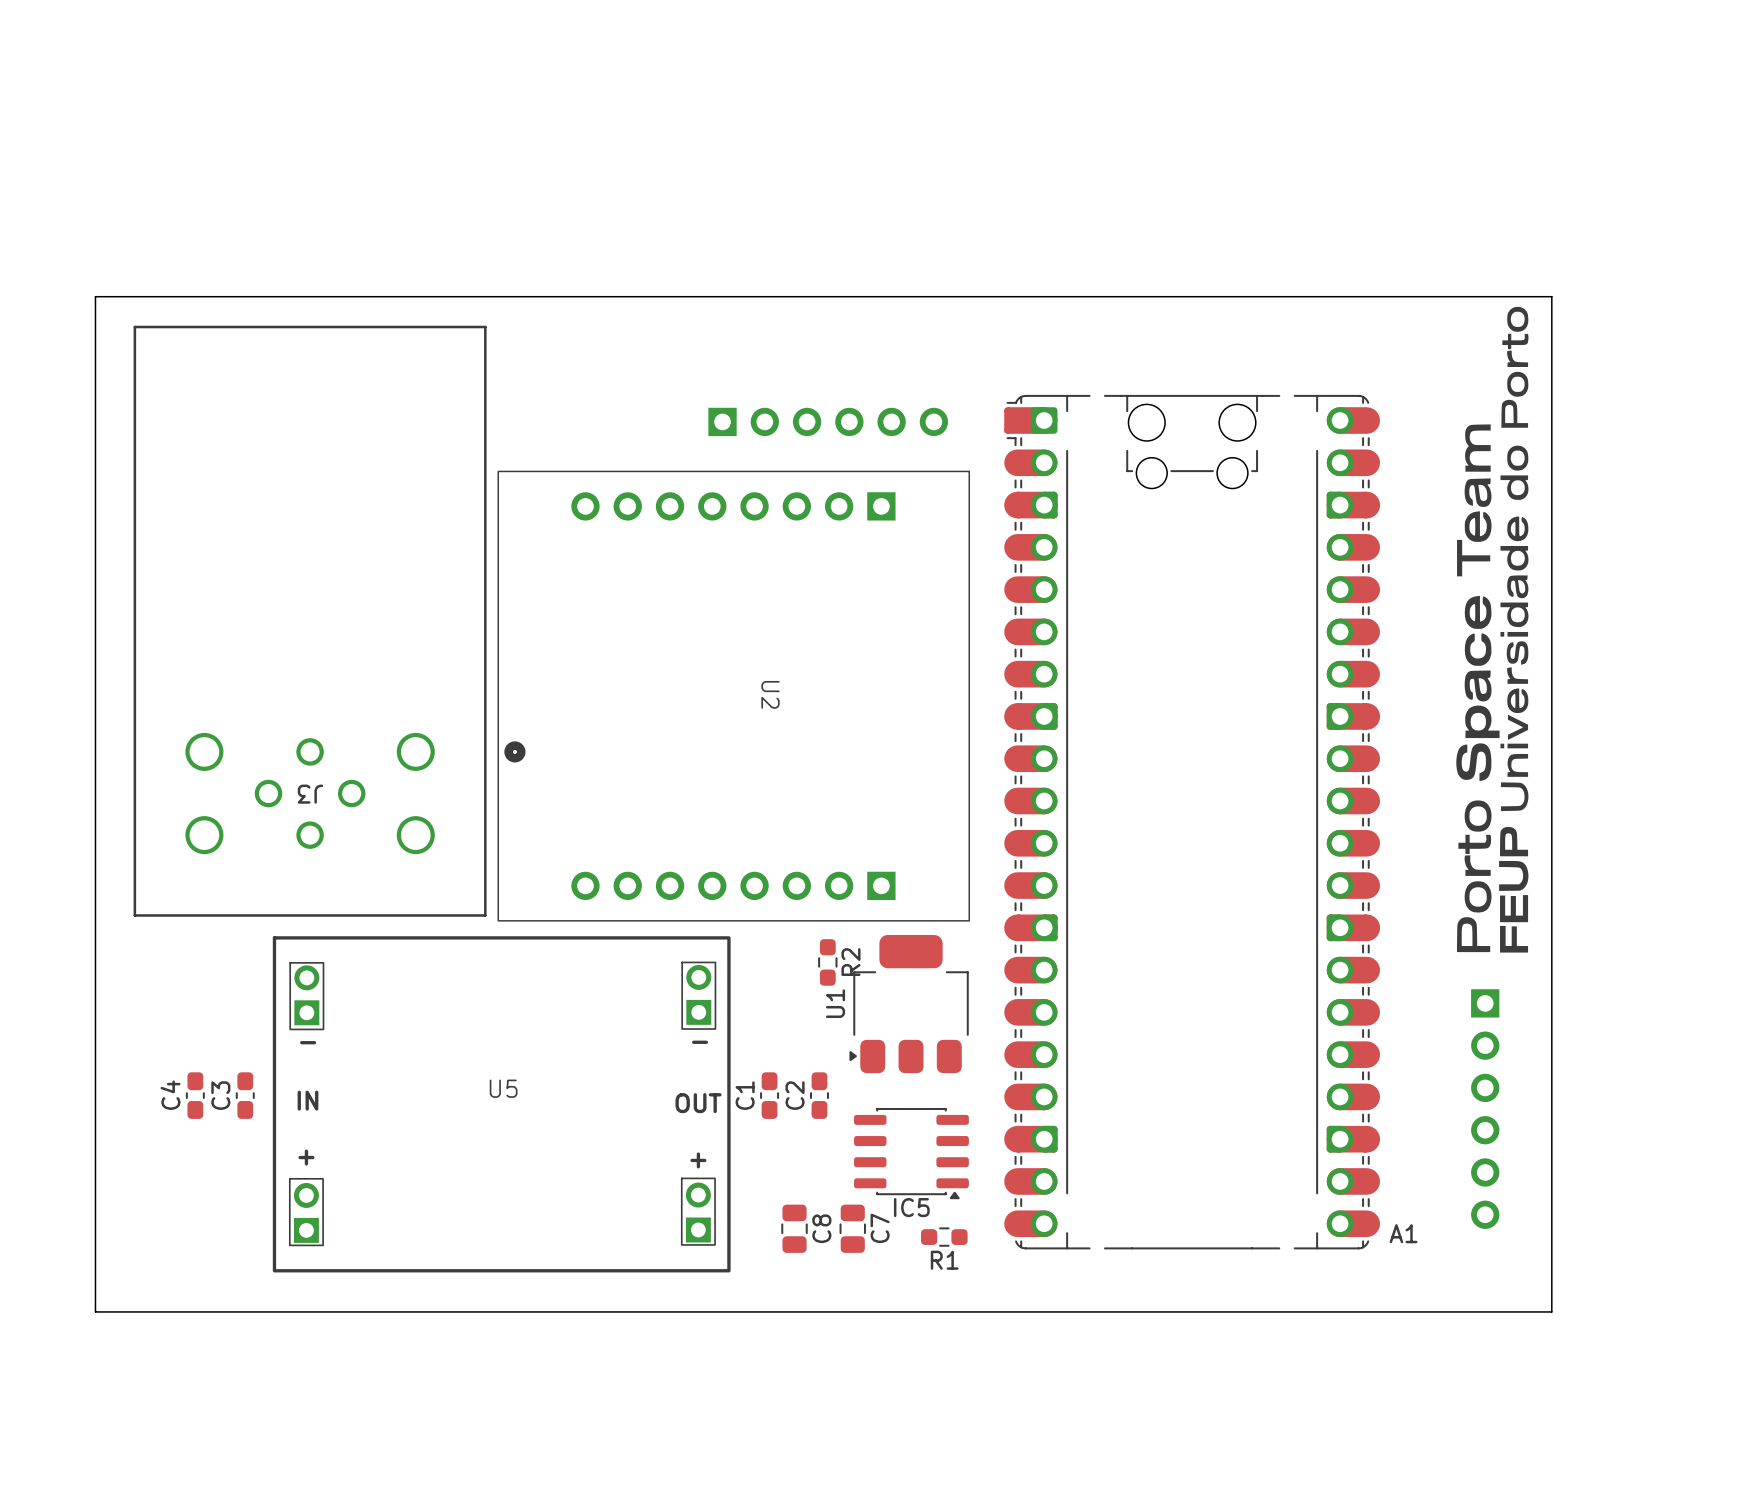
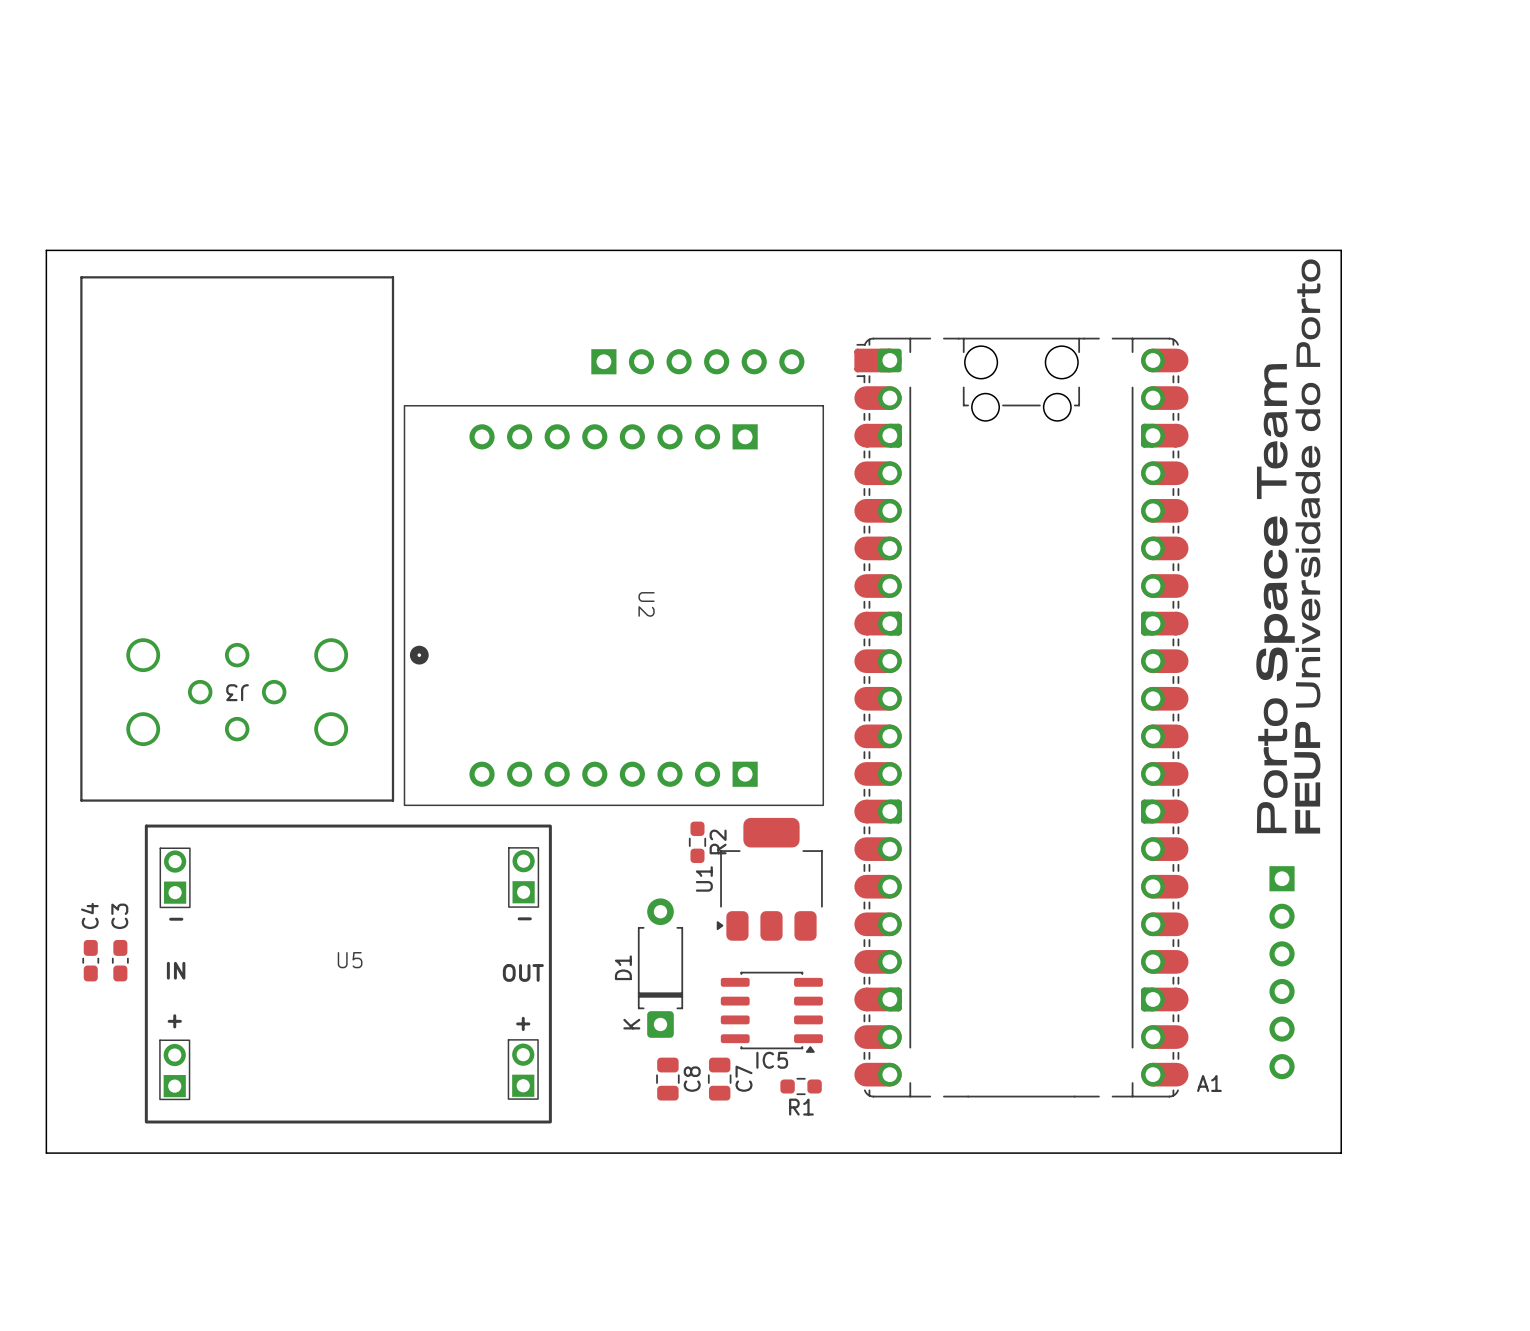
C4 name position: C4 (170, 1095) -> C4 (89, 915)
C4 position: (195, 1095) -> (90, 960)
C3 name position: C3 (220, 1095) -> C3 (119, 916)
C3 position: (245, 1095) -> (120, 960)
C1: (769, 1095) -> none
C2: (819, 1095) -> none
D1: none -> (660, 968)
U5 position: (501, 1104) -> (348, 974)

